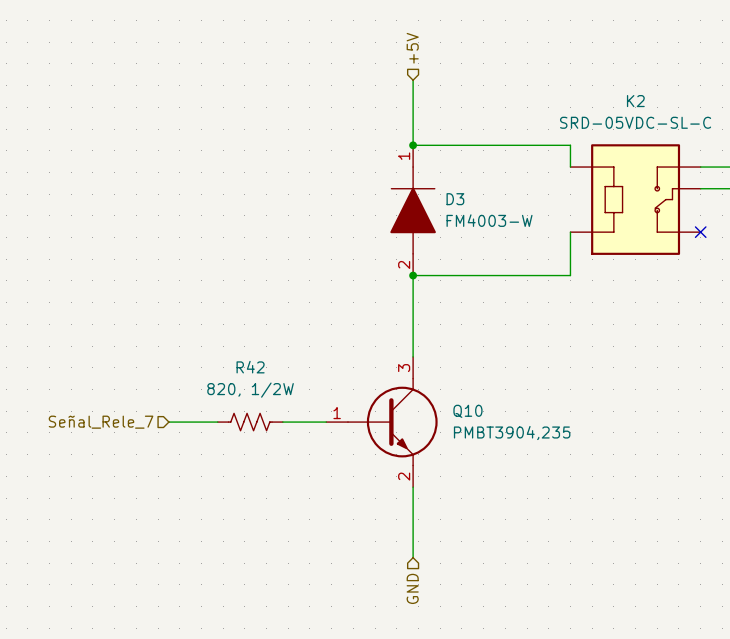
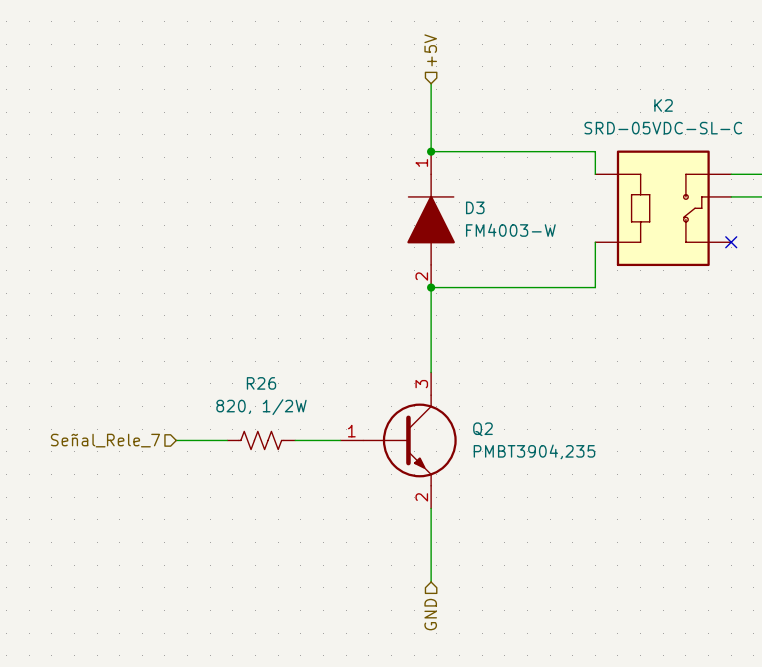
R42 name: R42 (250, 367) -> R26 (261, 383)
Q10 name: Q10 (467, 411) -> Q2 (482, 429)

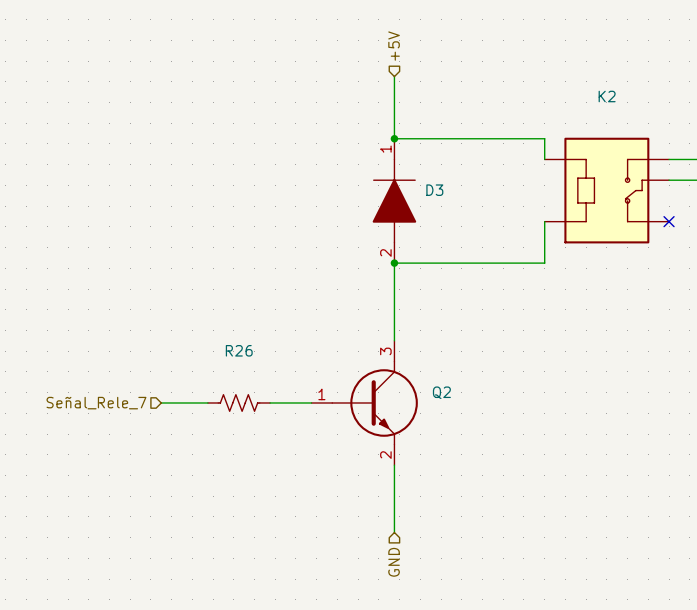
K2 value: SRD-05VDC-SL-C (663, 128) -> none
D3 value: FM4003-W (510, 230) -> none
R26 value: 820, 1/2W (261, 407) -> none
Q2 value: PMBT3904,235 (534, 451) -> none

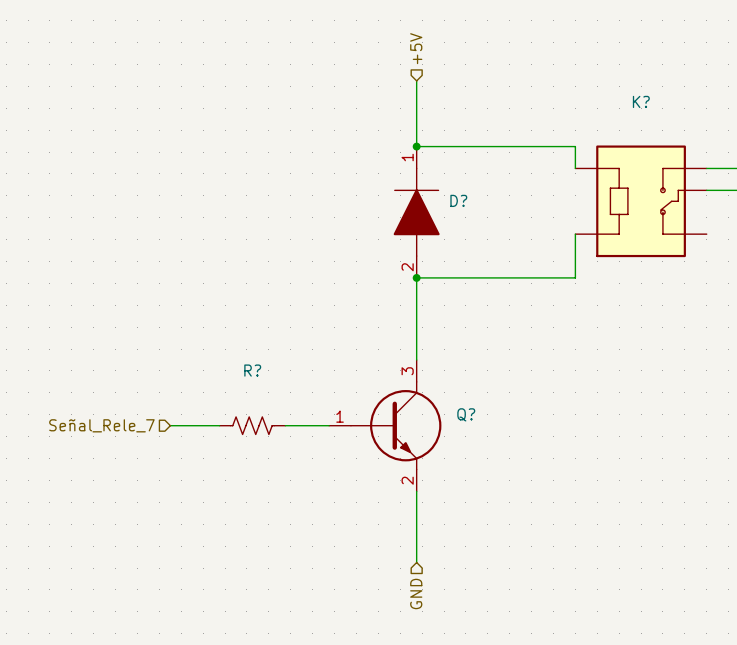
K2 name: K2 (607, 96) -> K? (641, 101)
D3 name: D3 (434, 190) -> D? (458, 200)
no-connect mark: (669, 221) -> none
R26 name: R26 (239, 350) -> R? (252, 370)
Q2 name: Q2 (441, 392) -> Q? (466, 414)

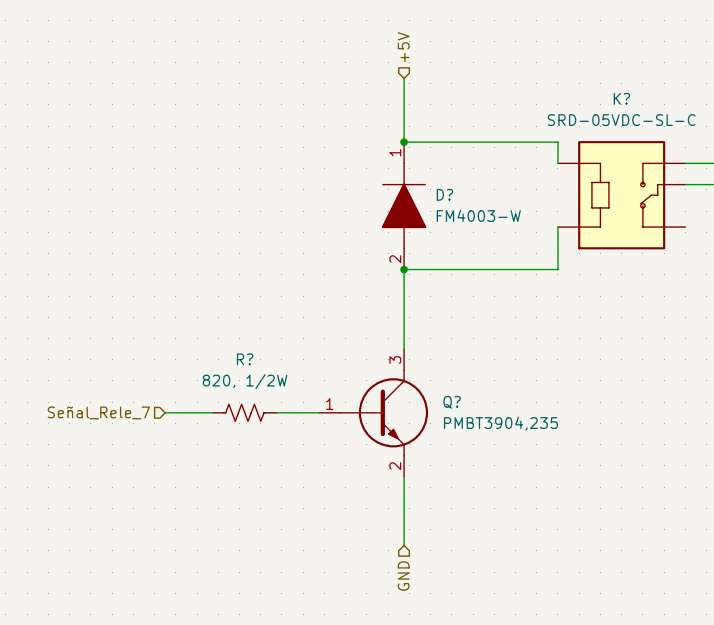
K? value: none -> SRD-05VDC-SL-C (621, 120)
D? value: none -> FM4003-W (478, 215)
R? value: none -> 820, 1/2W (245, 381)
Q? value: none -> PMBT3904,235 (500, 423)

